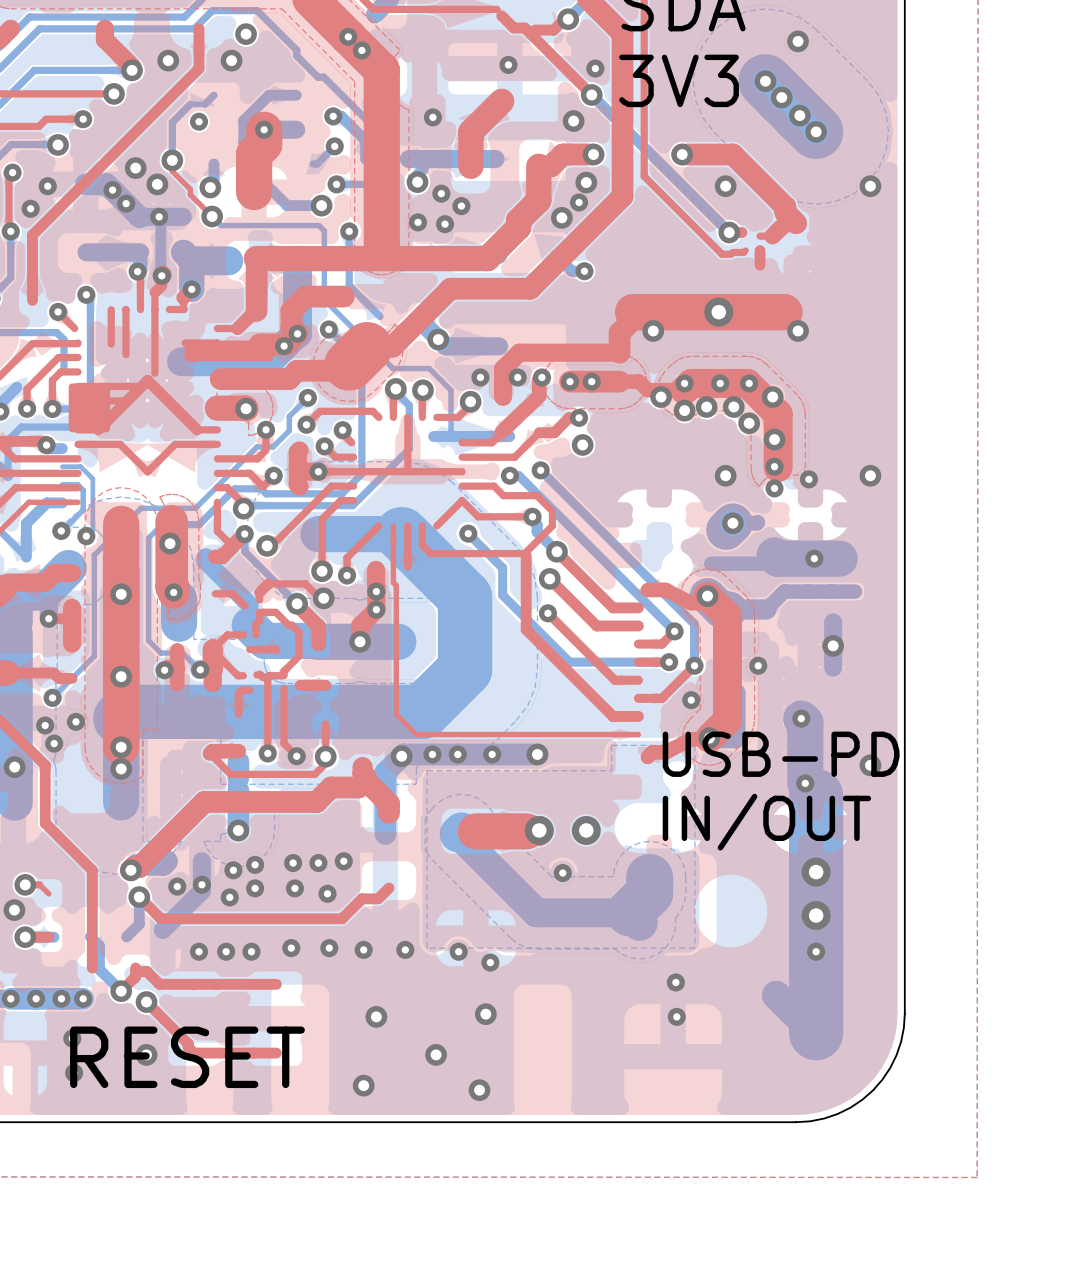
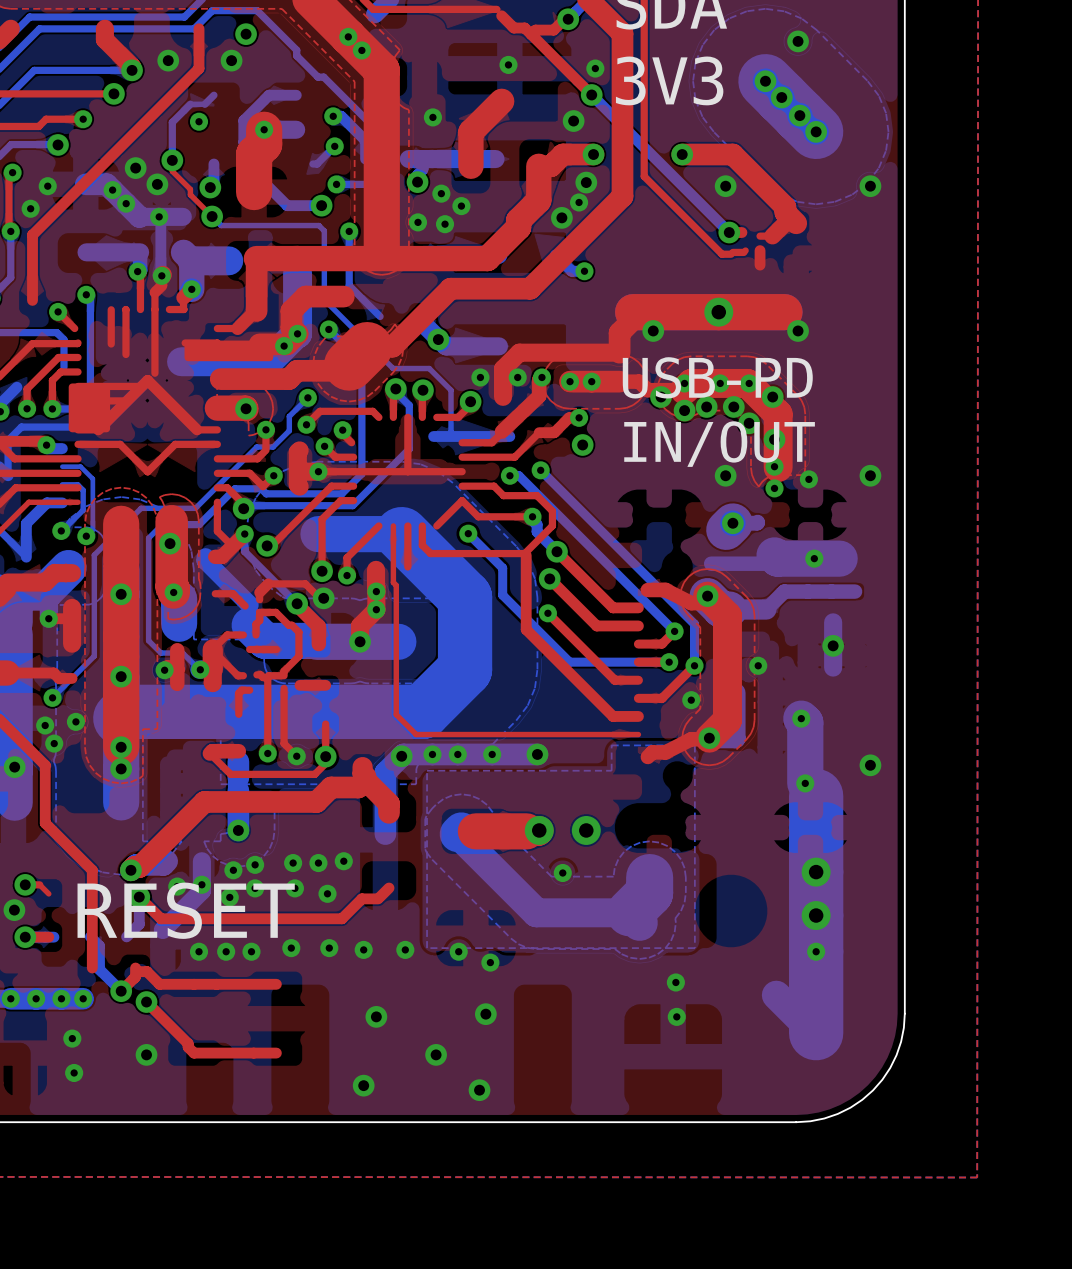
text position: USB-PD (781, 754) -> USB-PD (717, 377)
text position: IN/OUT (766, 822) -> IN/OUT (719, 444)
text position: RESET (187, 1057) -> RESET (186, 910)

